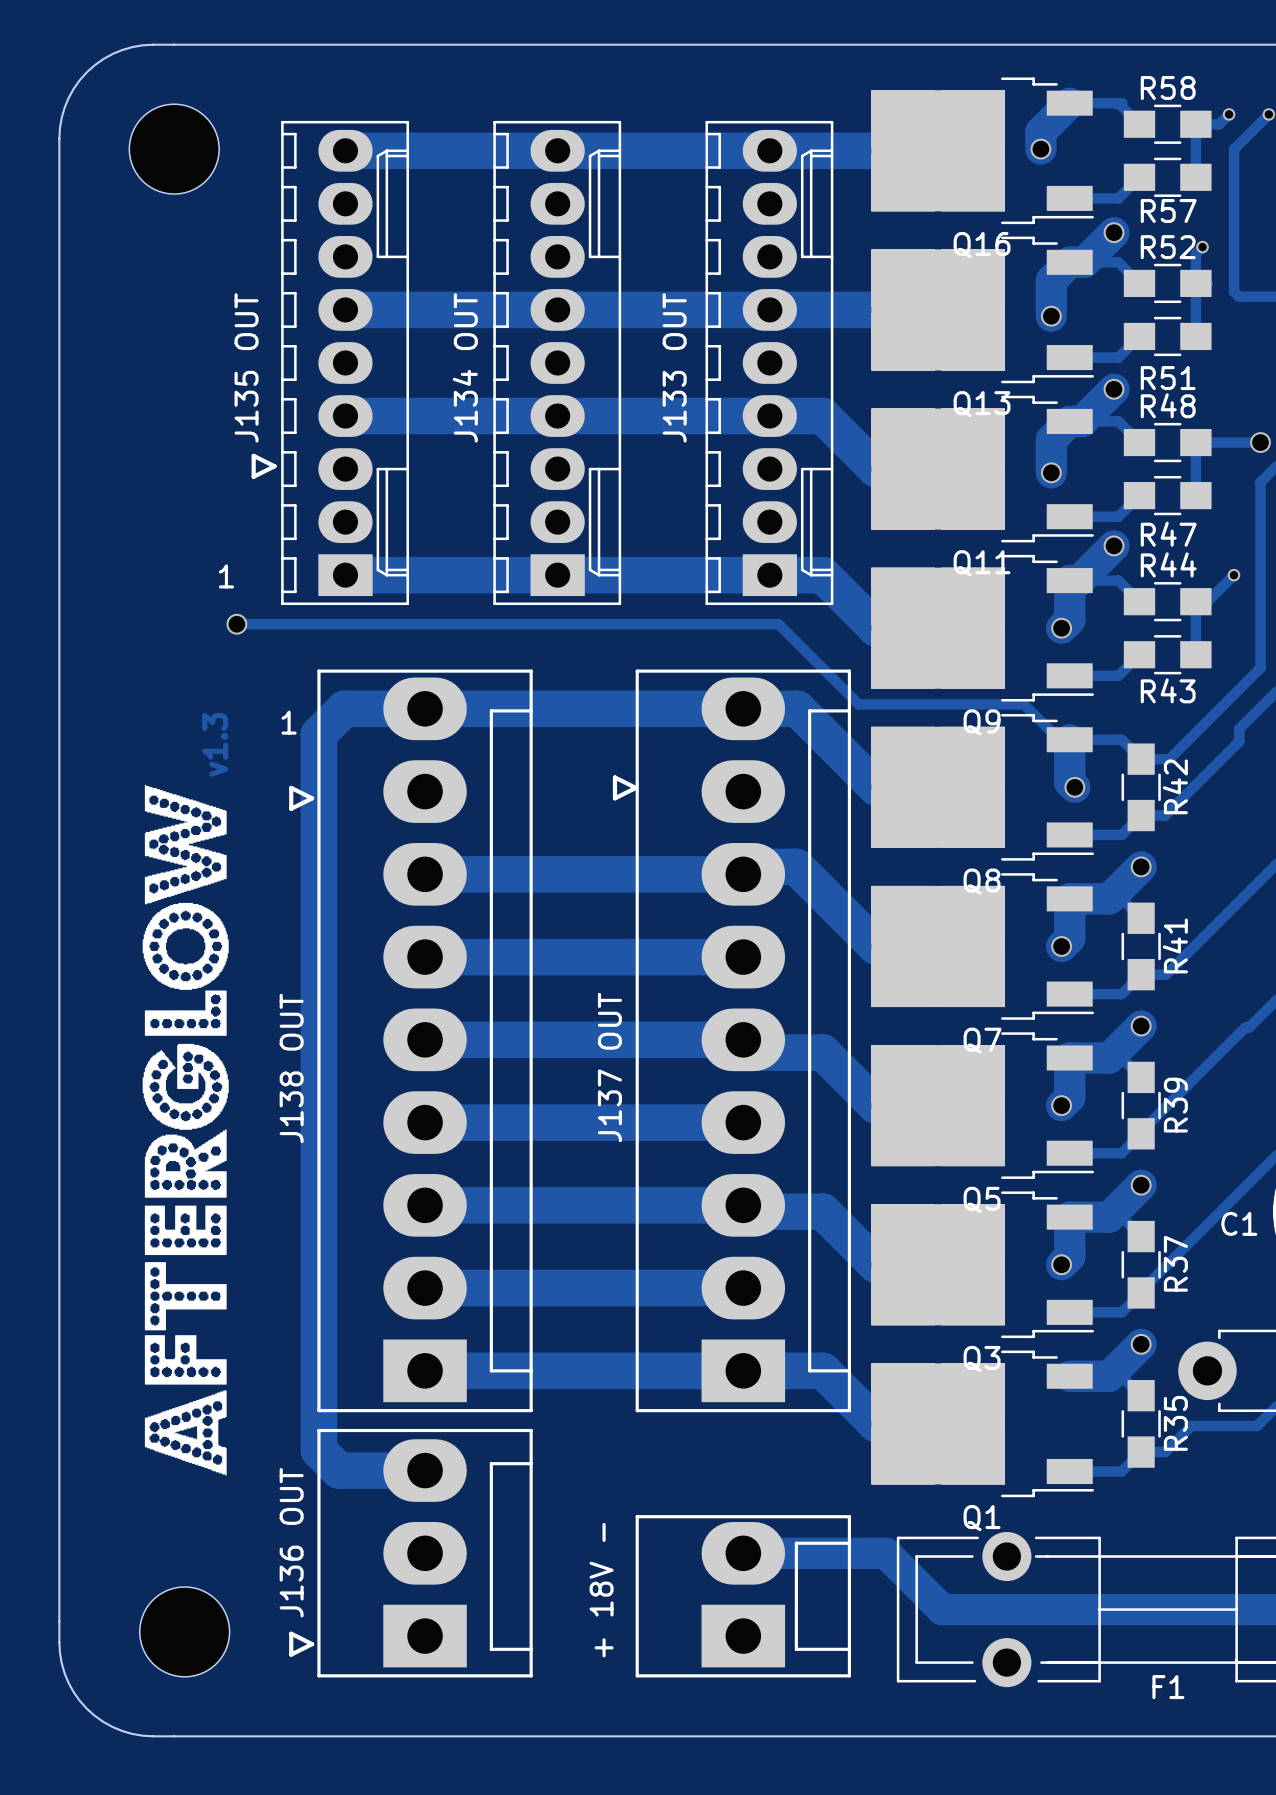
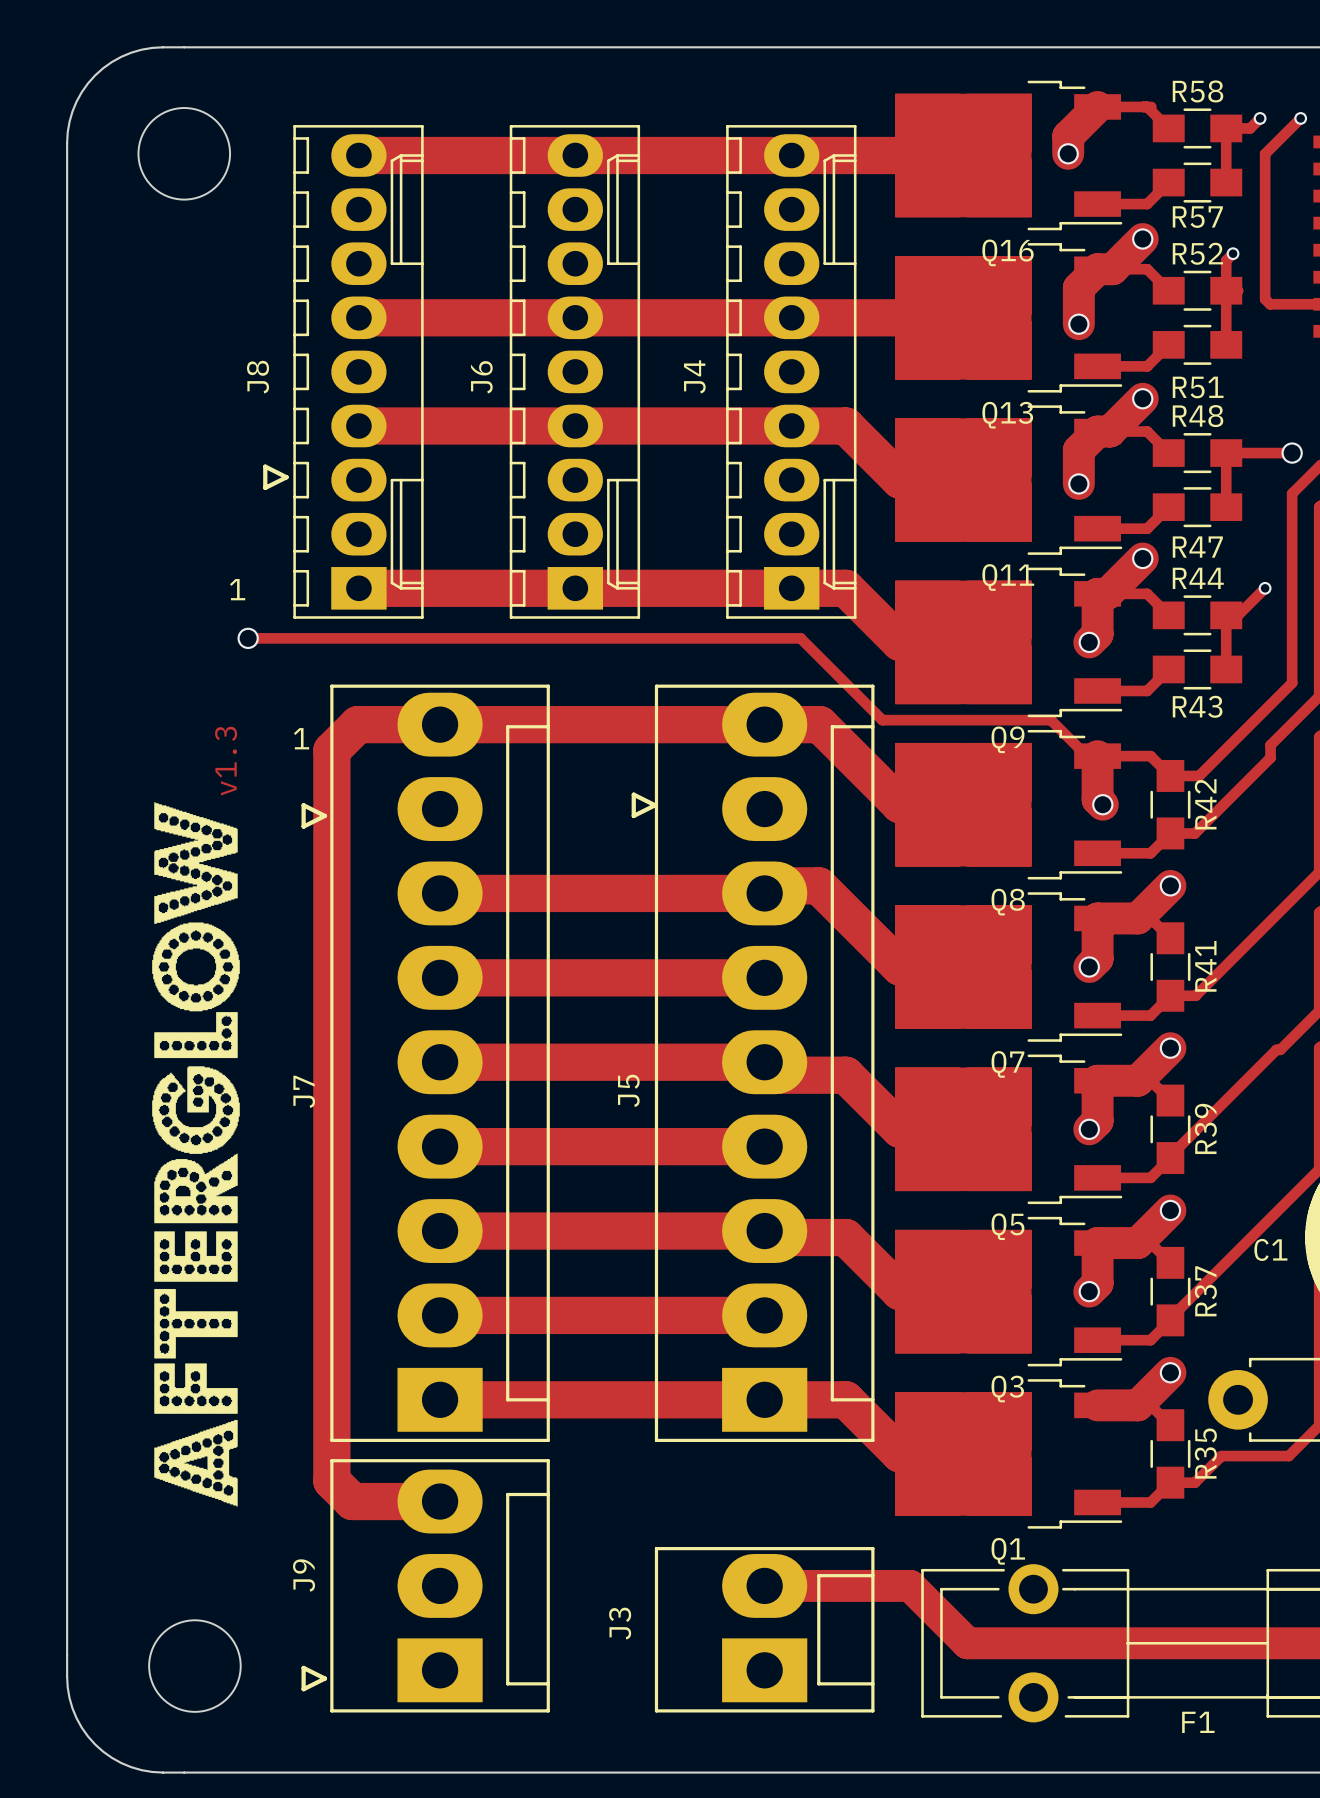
J135 OUT name: J135 OUT (246, 367) -> J8 (258, 377)
J134 OUT name: J134 OUT (465, 367) -> J6 (481, 377)
J133 OUT name: J133 OUT (674, 367) -> J4 (694, 376)
J137 OUT name: J137 OUT (609, 1067) -> J5 (628, 1090)
J138 OUT name: J138 OUT (291, 1068) -> J7 (304, 1091)
J136 OUT name: J136 OUT (291, 1542) -> J9 (304, 1575)
+ 18V - name: + 18V - (601, 1590) -> J3 (620, 1623)

